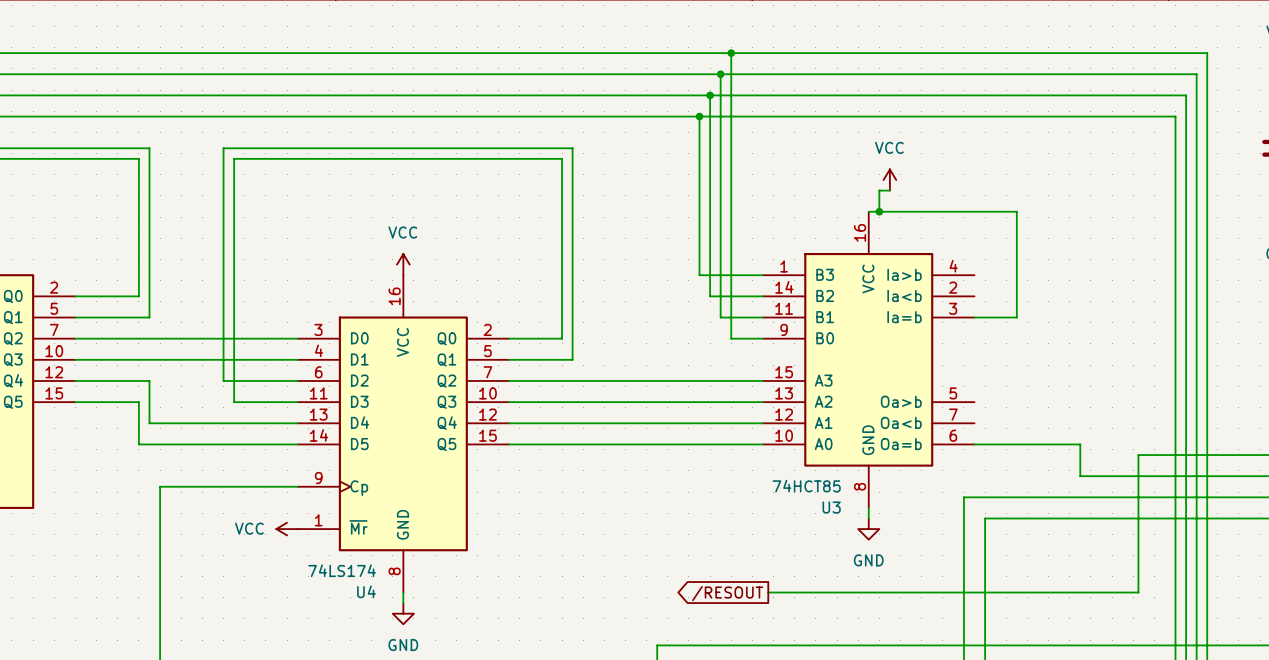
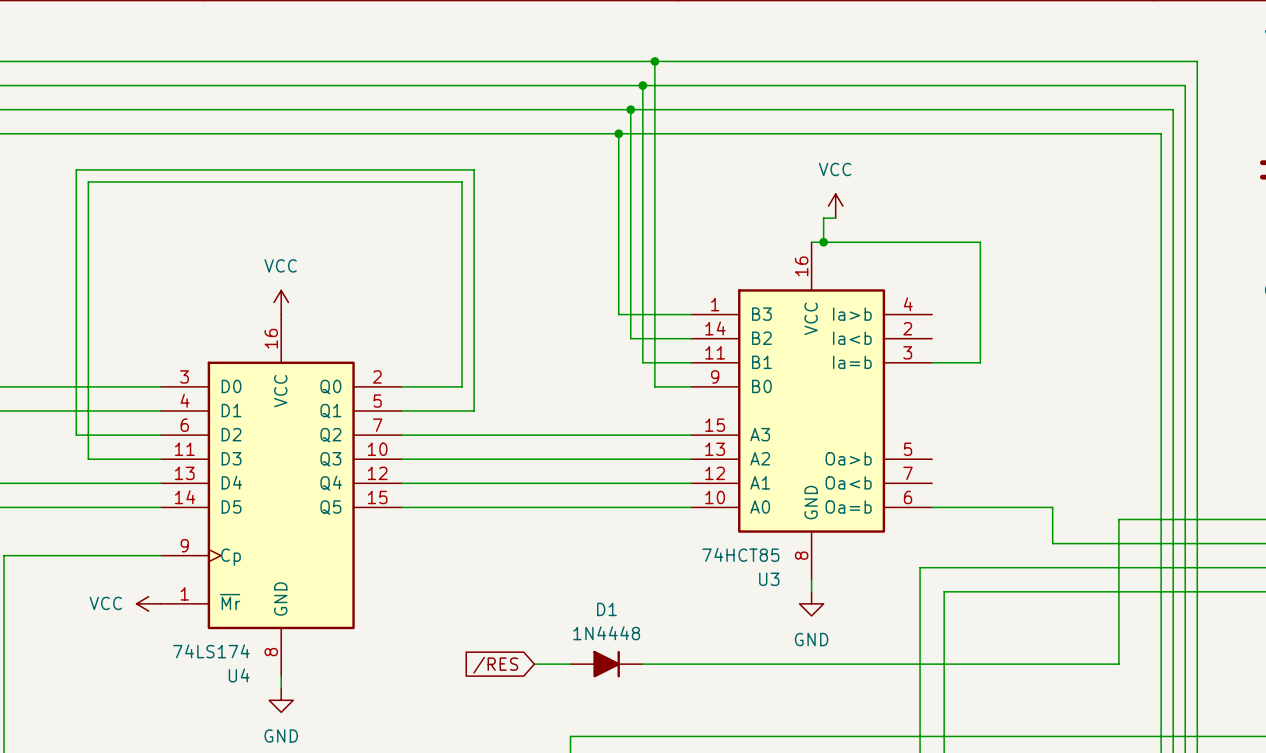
wire: none -> (534, 664) (570, 664)
D1: none -> 1N4448 (606, 664)
wire: (1138, 581) (1138, 592) (768, 592) -> (1118, 664) (642, 664)
global label: none -> /RES (495, 665)
global label: /RESOUT (727, 593) -> none

